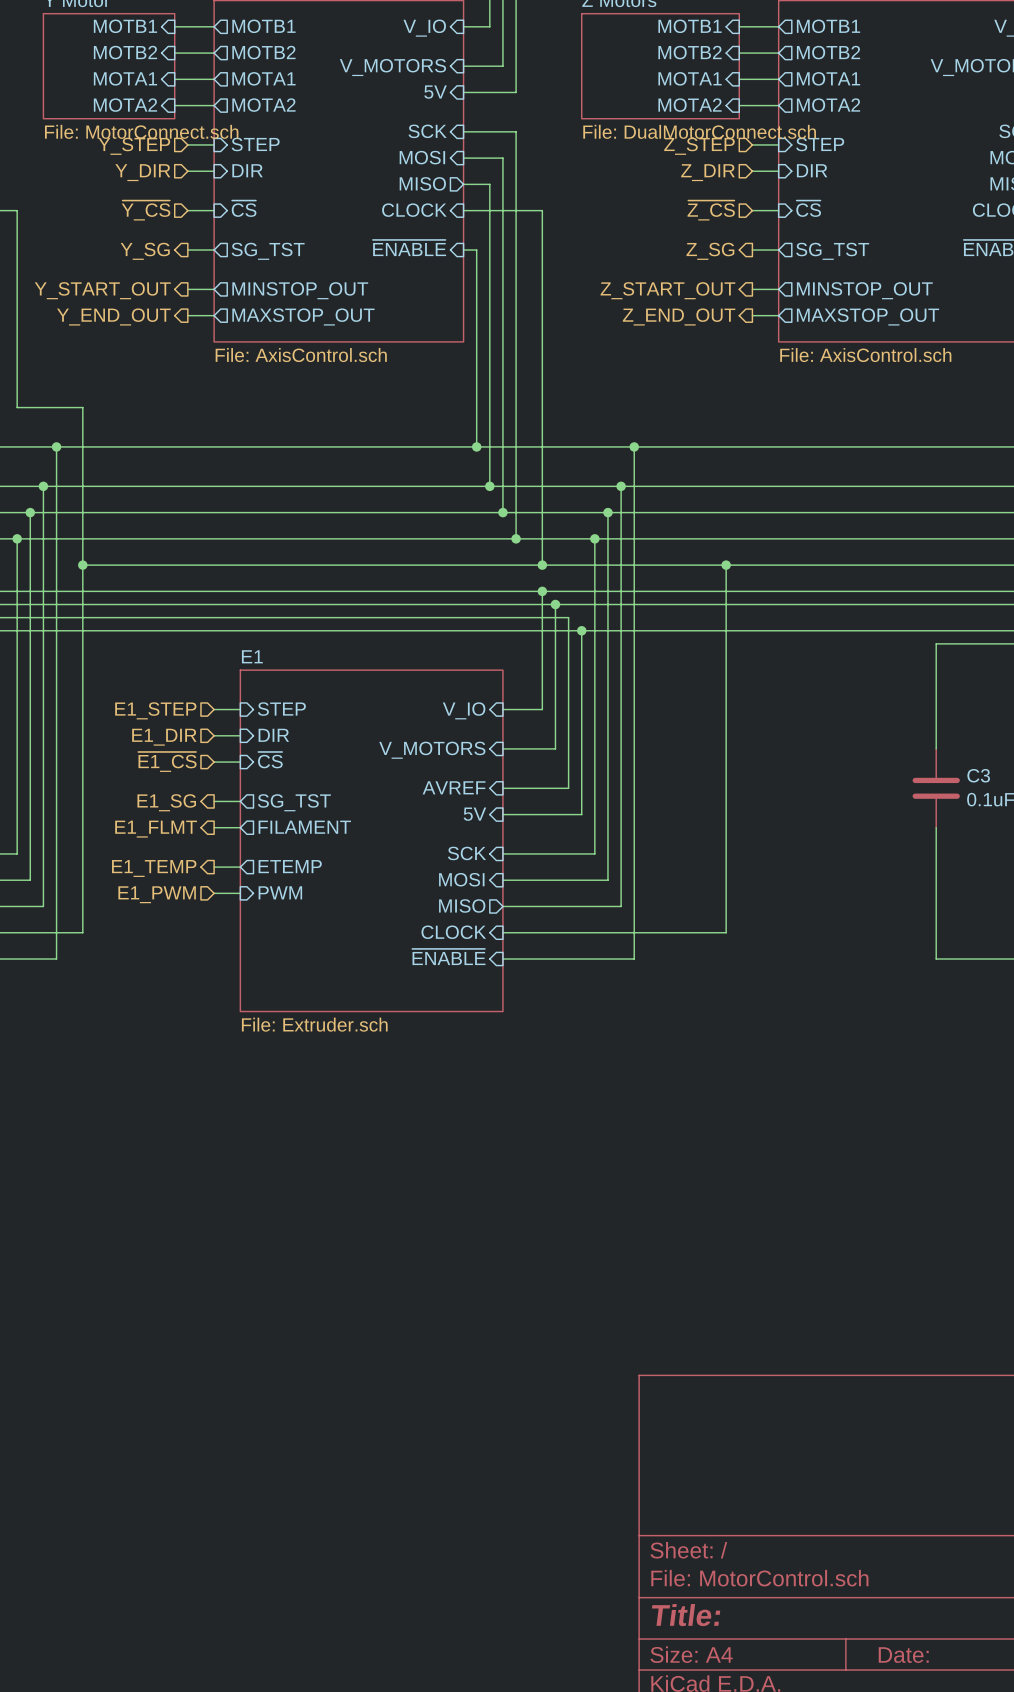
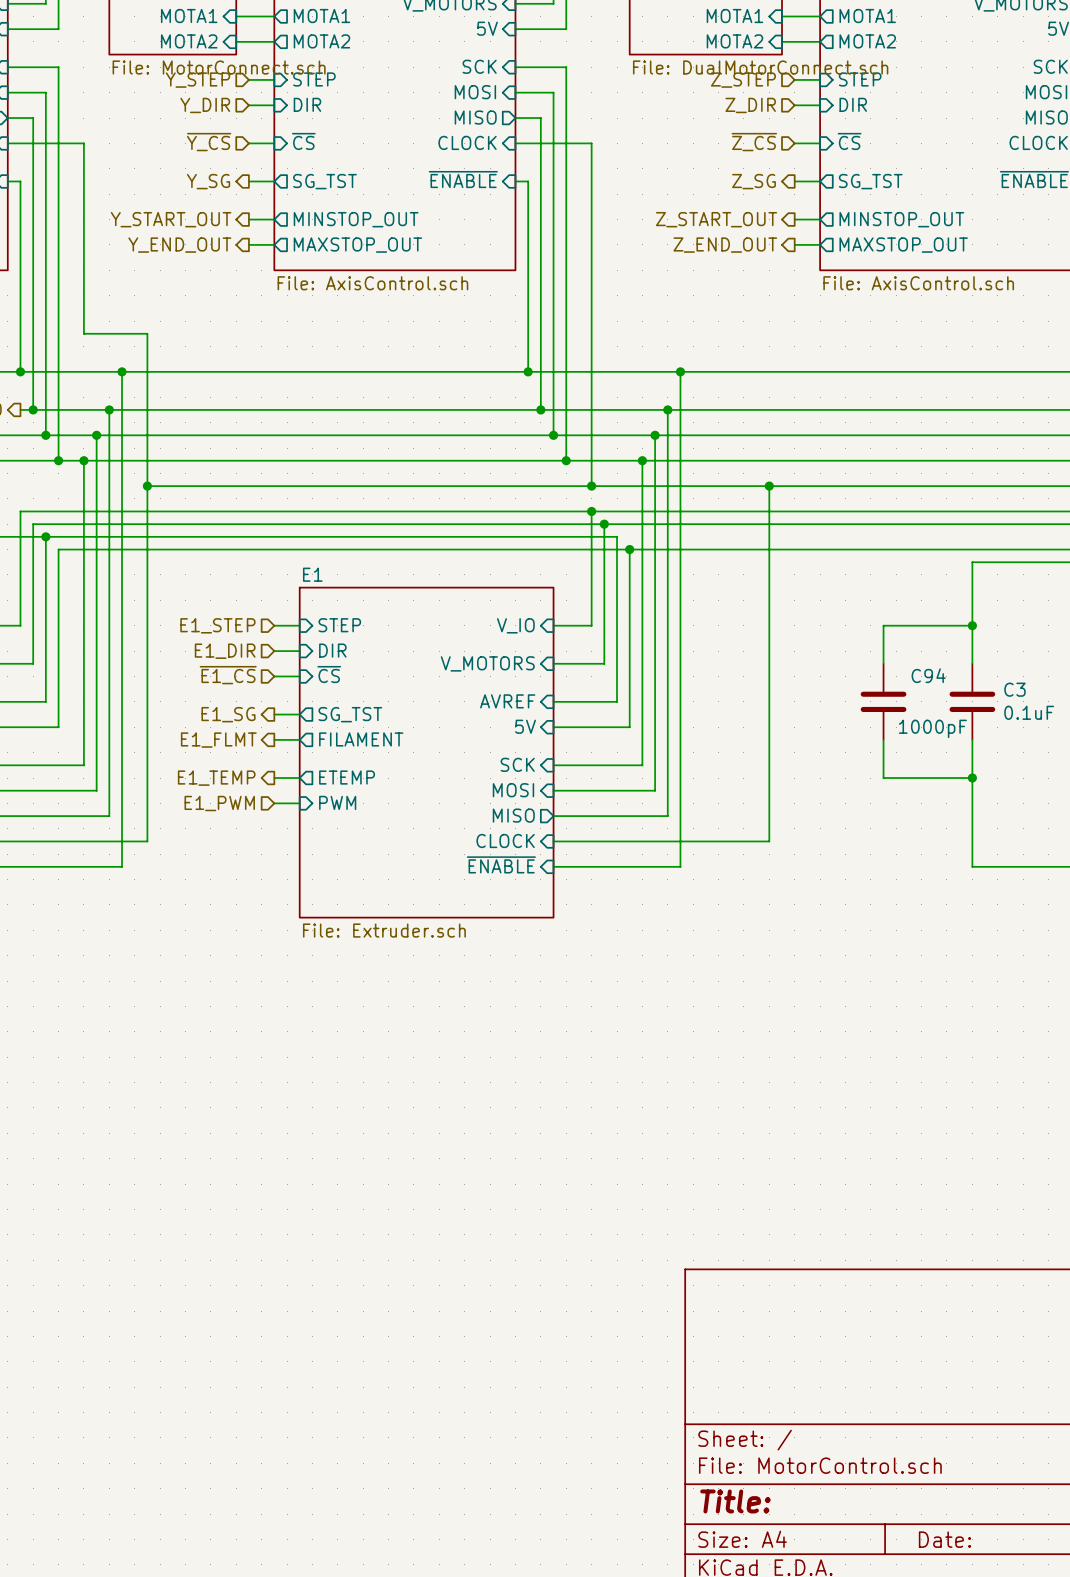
wire: none -> (972, 625) (883, 625) (883, 663)
junction: none -> (972, 625)
C94: none -> 1000pF (883, 701)
wire: none -> (883, 739) (883, 778) (972, 778)
junction: none -> (972, 778)

